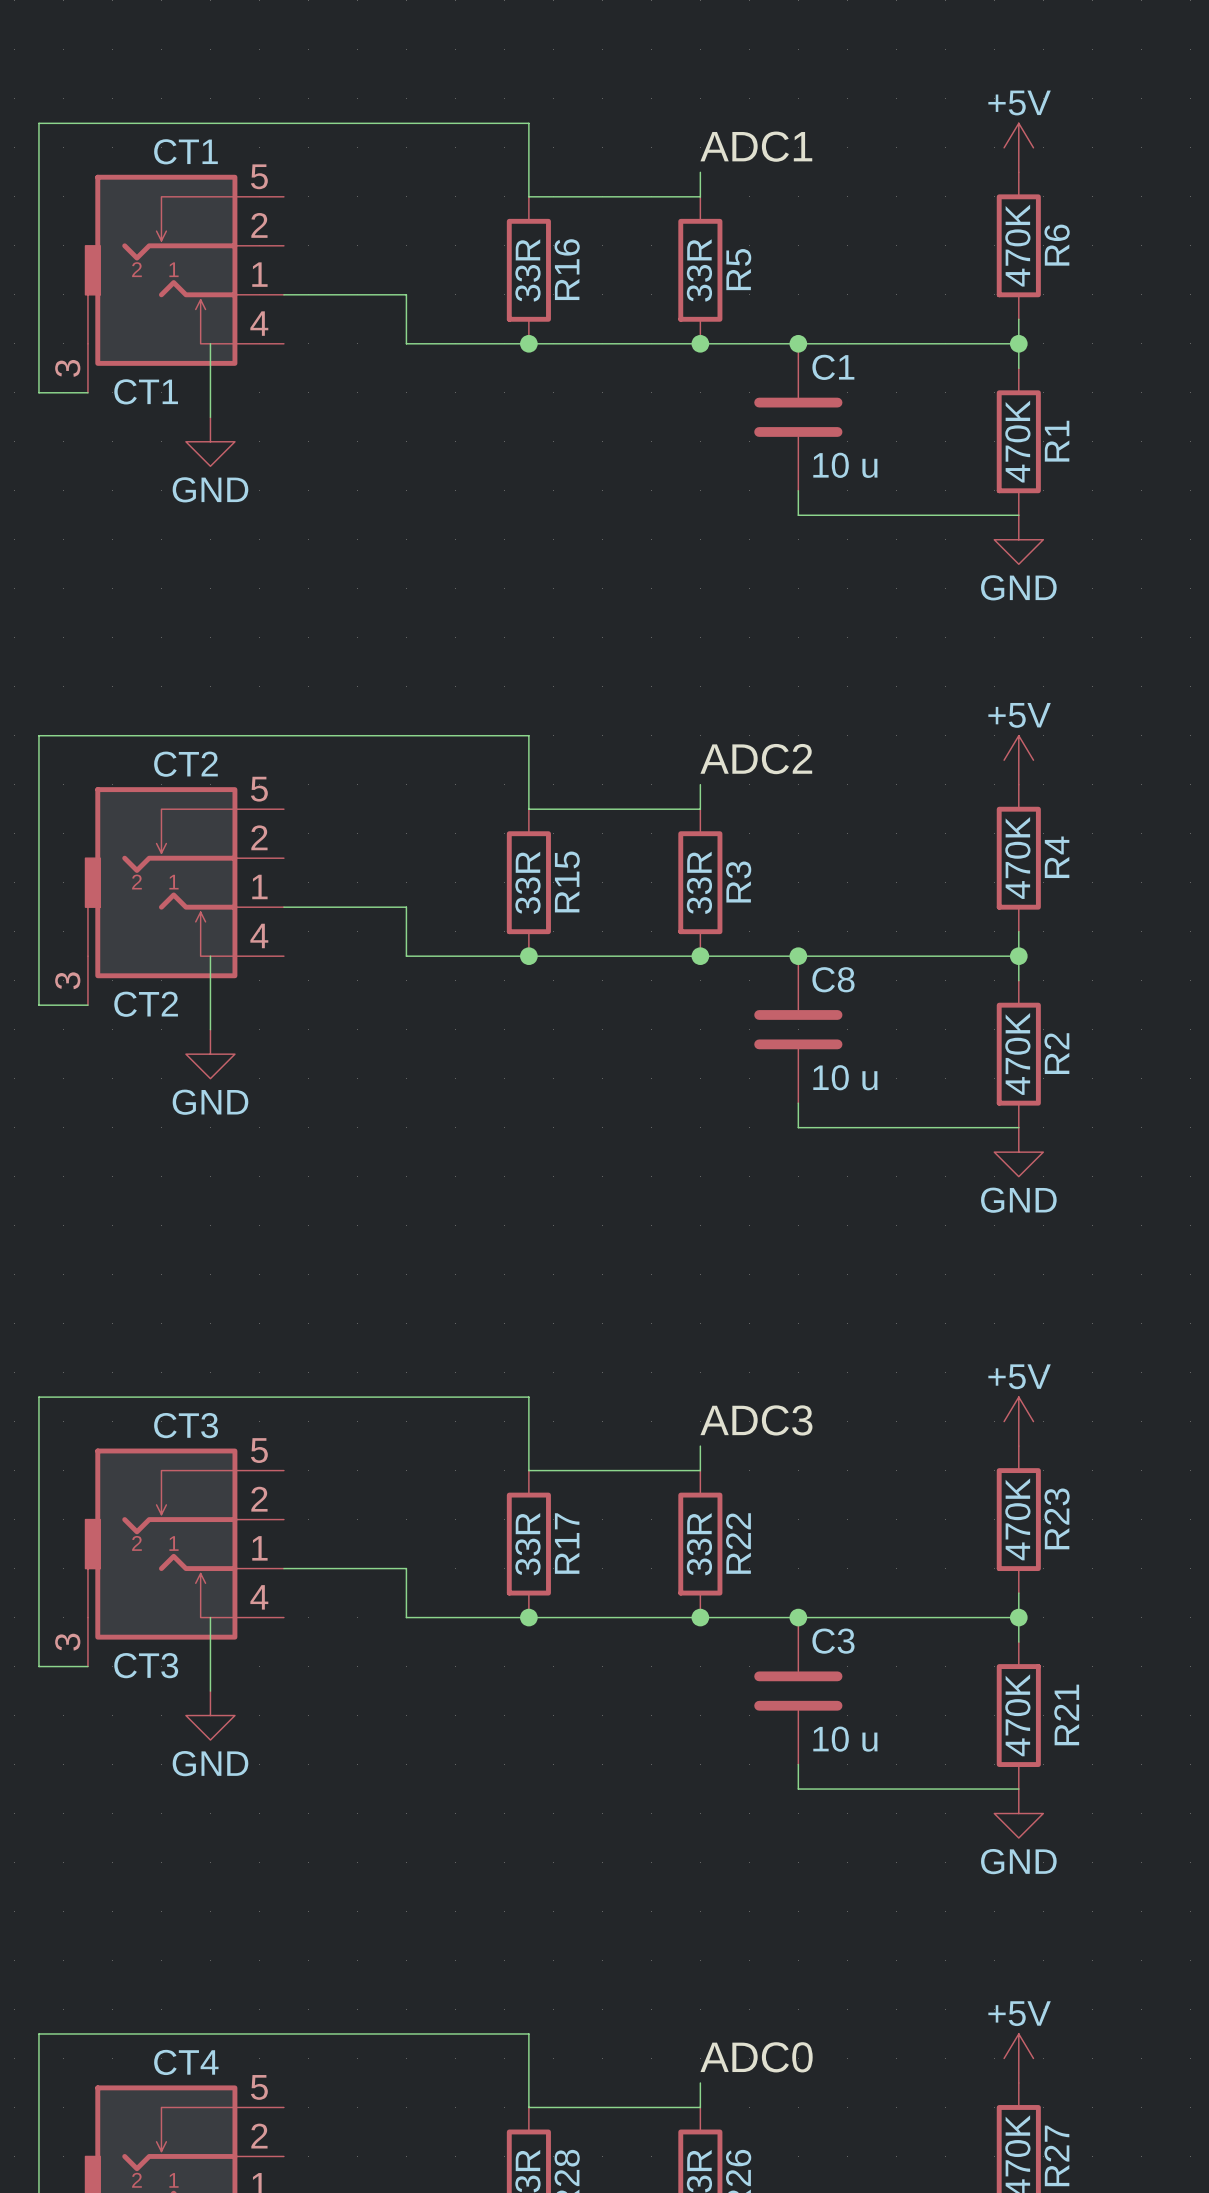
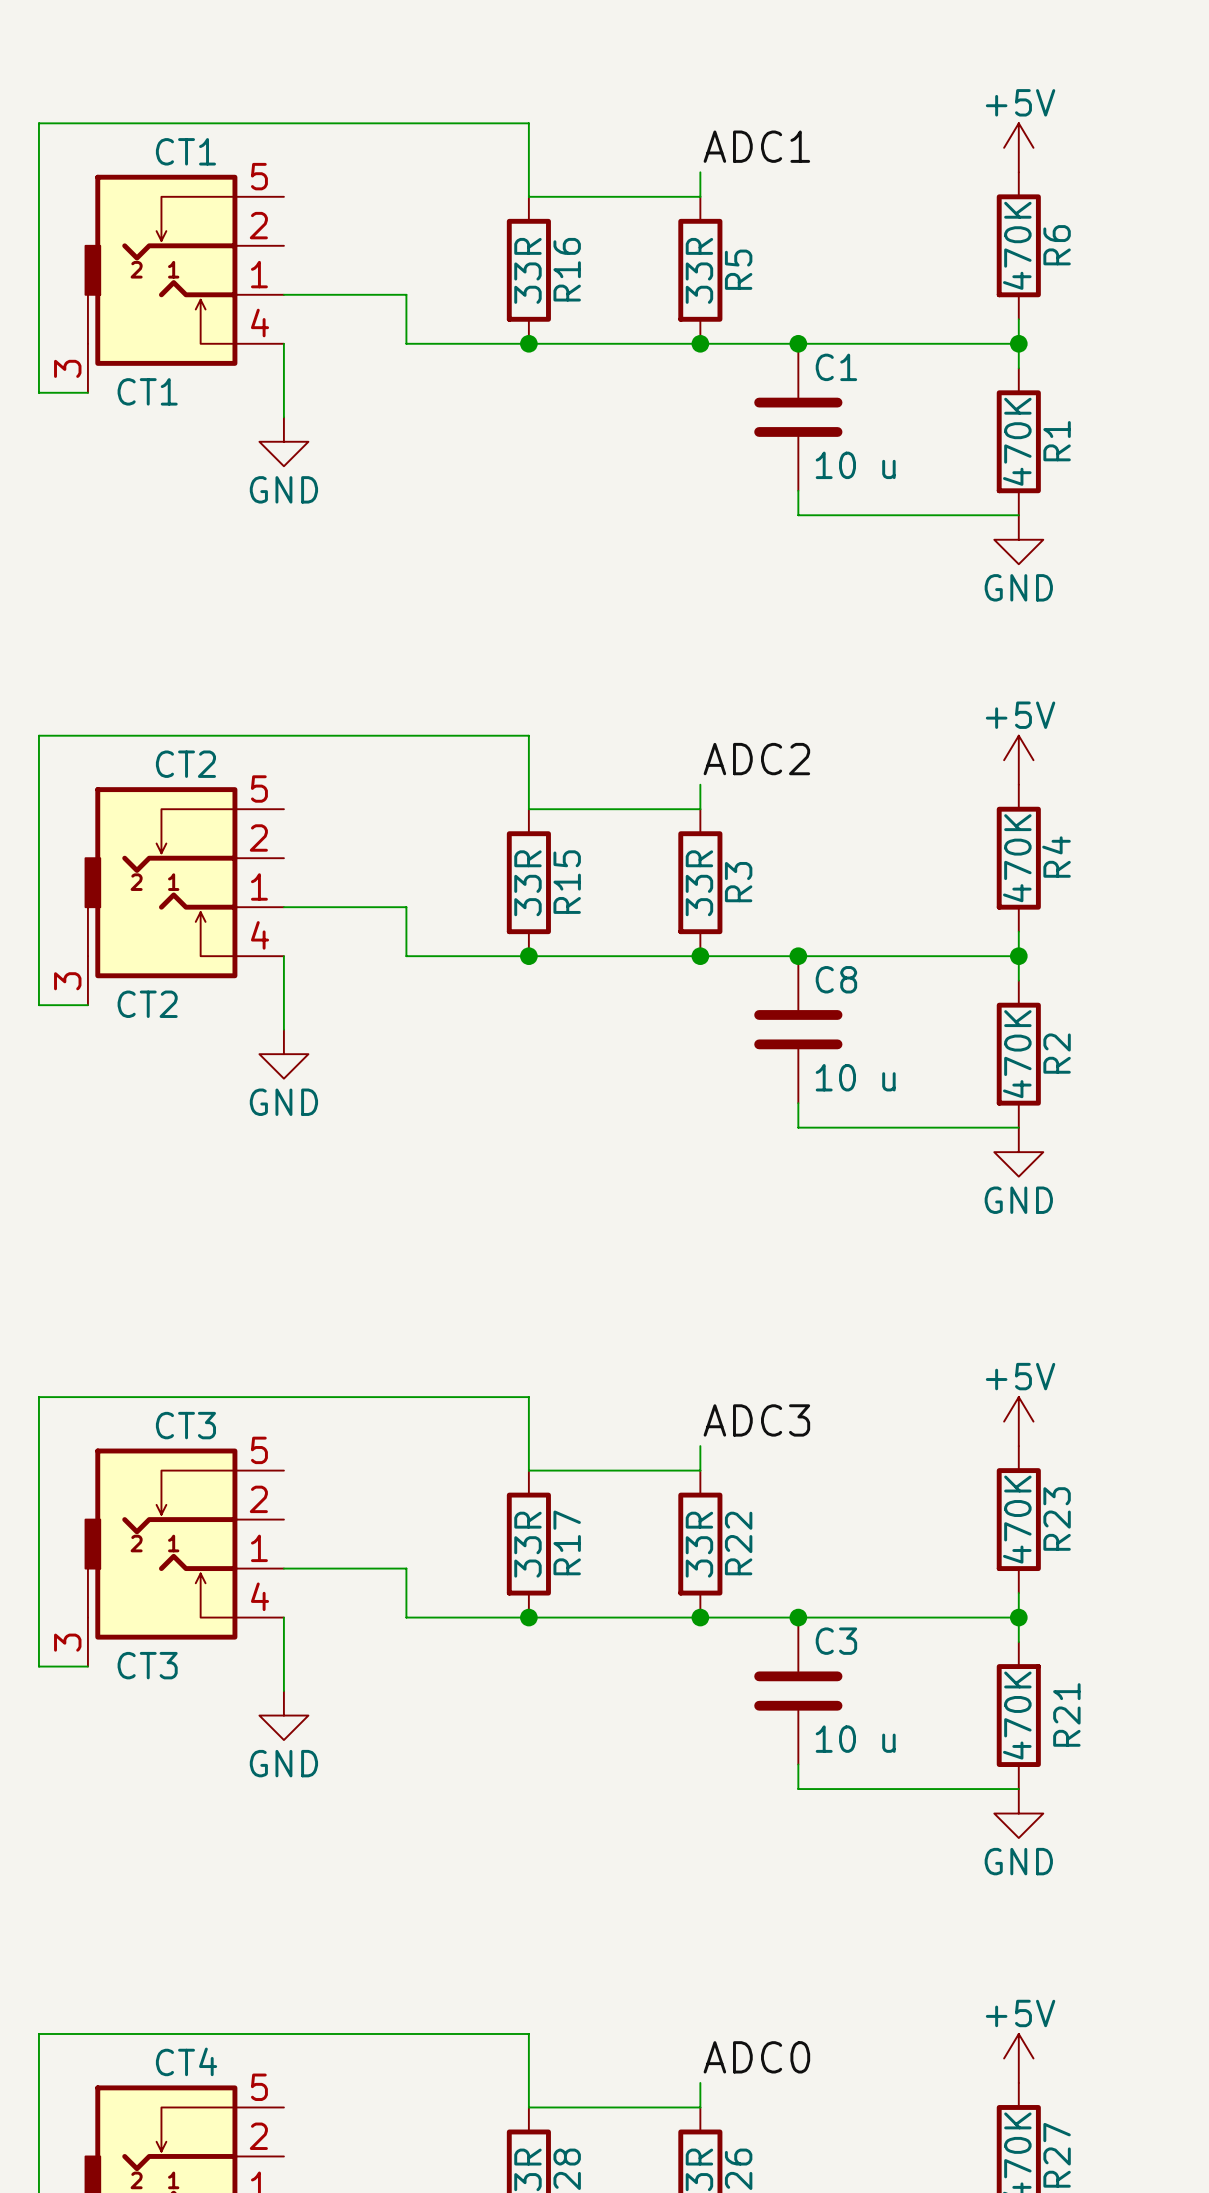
wire: (210, 343) (210, 417) -> (283, 343) (283, 417)
power symbol position: GND (210, 441) -> GND (283, 441)
wire: (210, 956) (210, 1029) -> (283, 956) (283, 1029)
power symbol position: GND (210, 1054) -> GND (283, 1054)
wire: (210, 1617) (210, 1691) -> (283, 1617) (283, 1691)
power symbol position: GND (210, 1715) -> GND (283, 1715)

